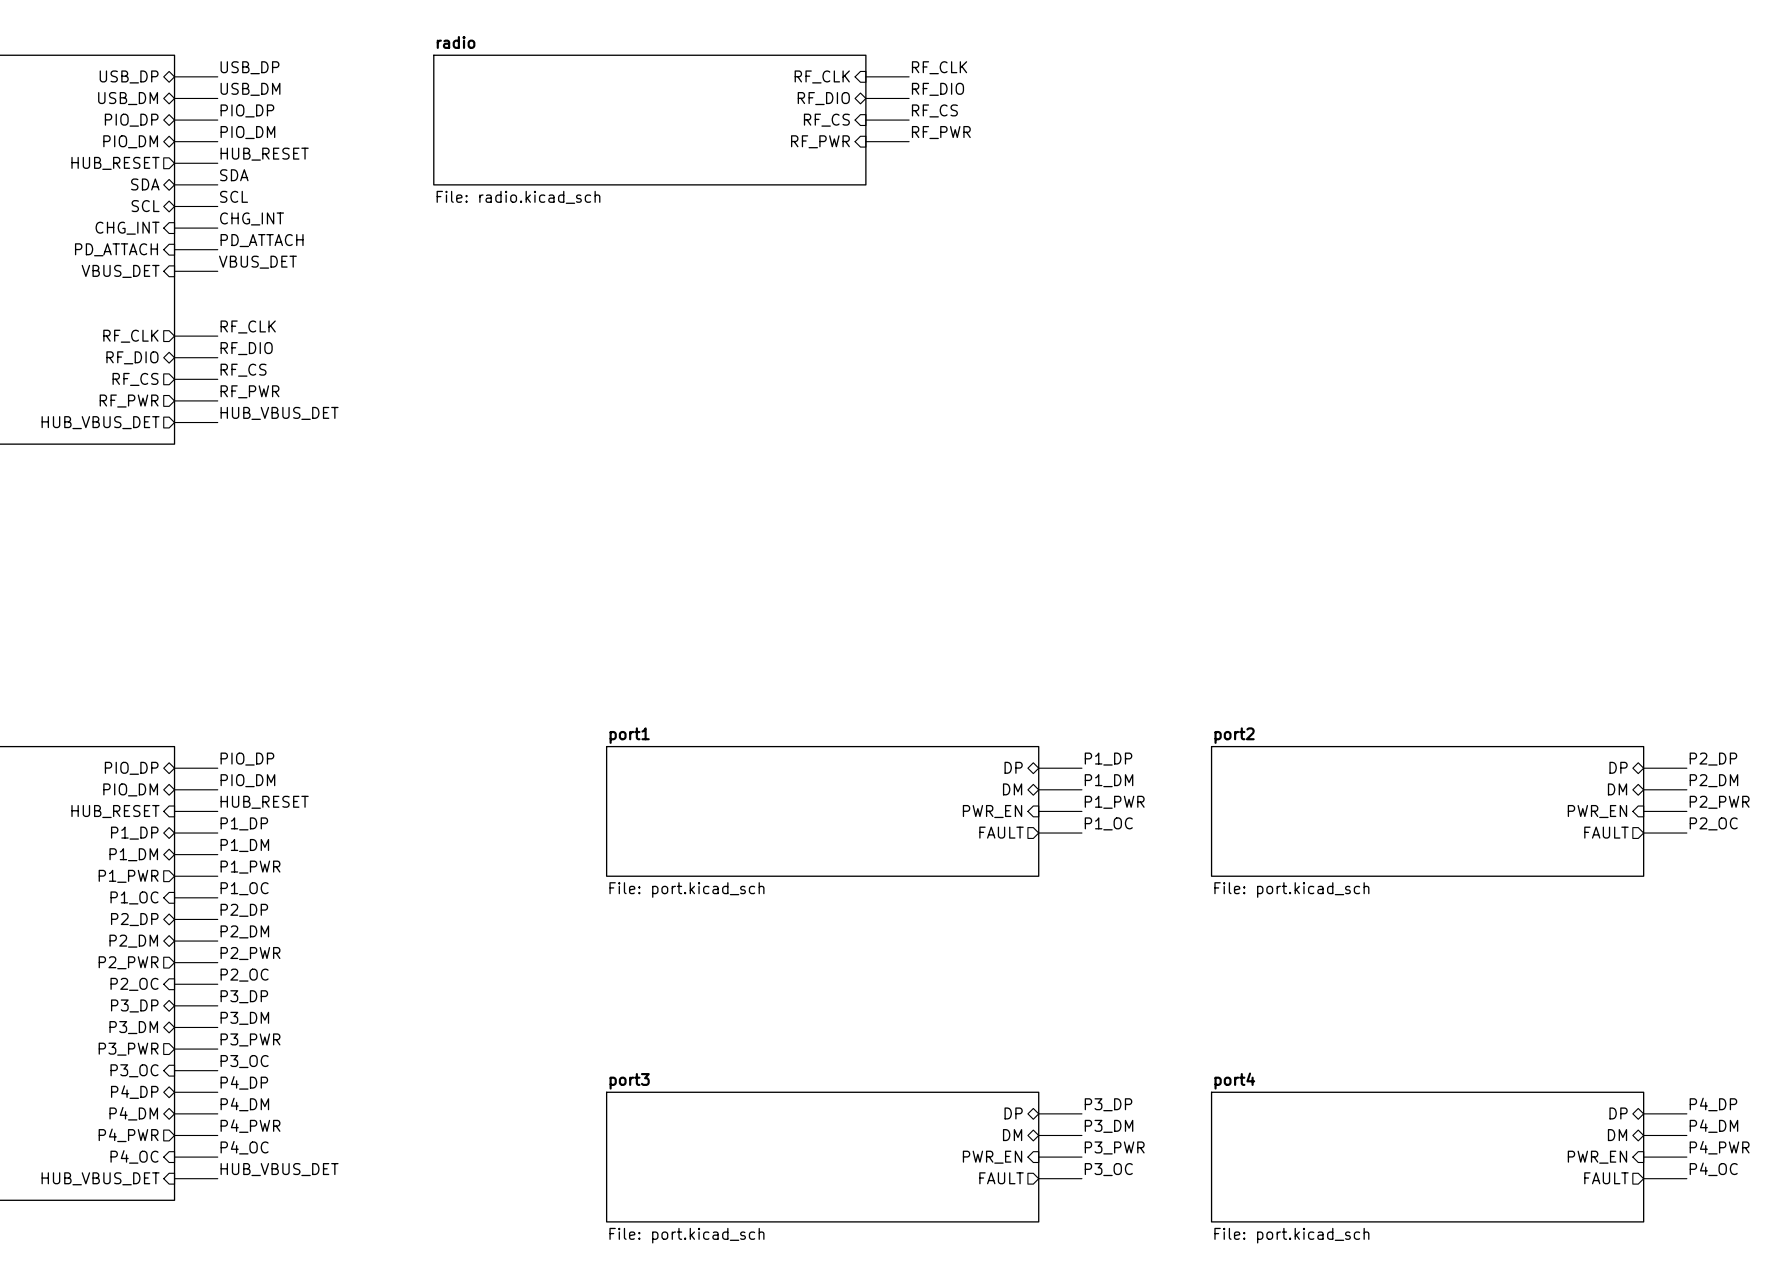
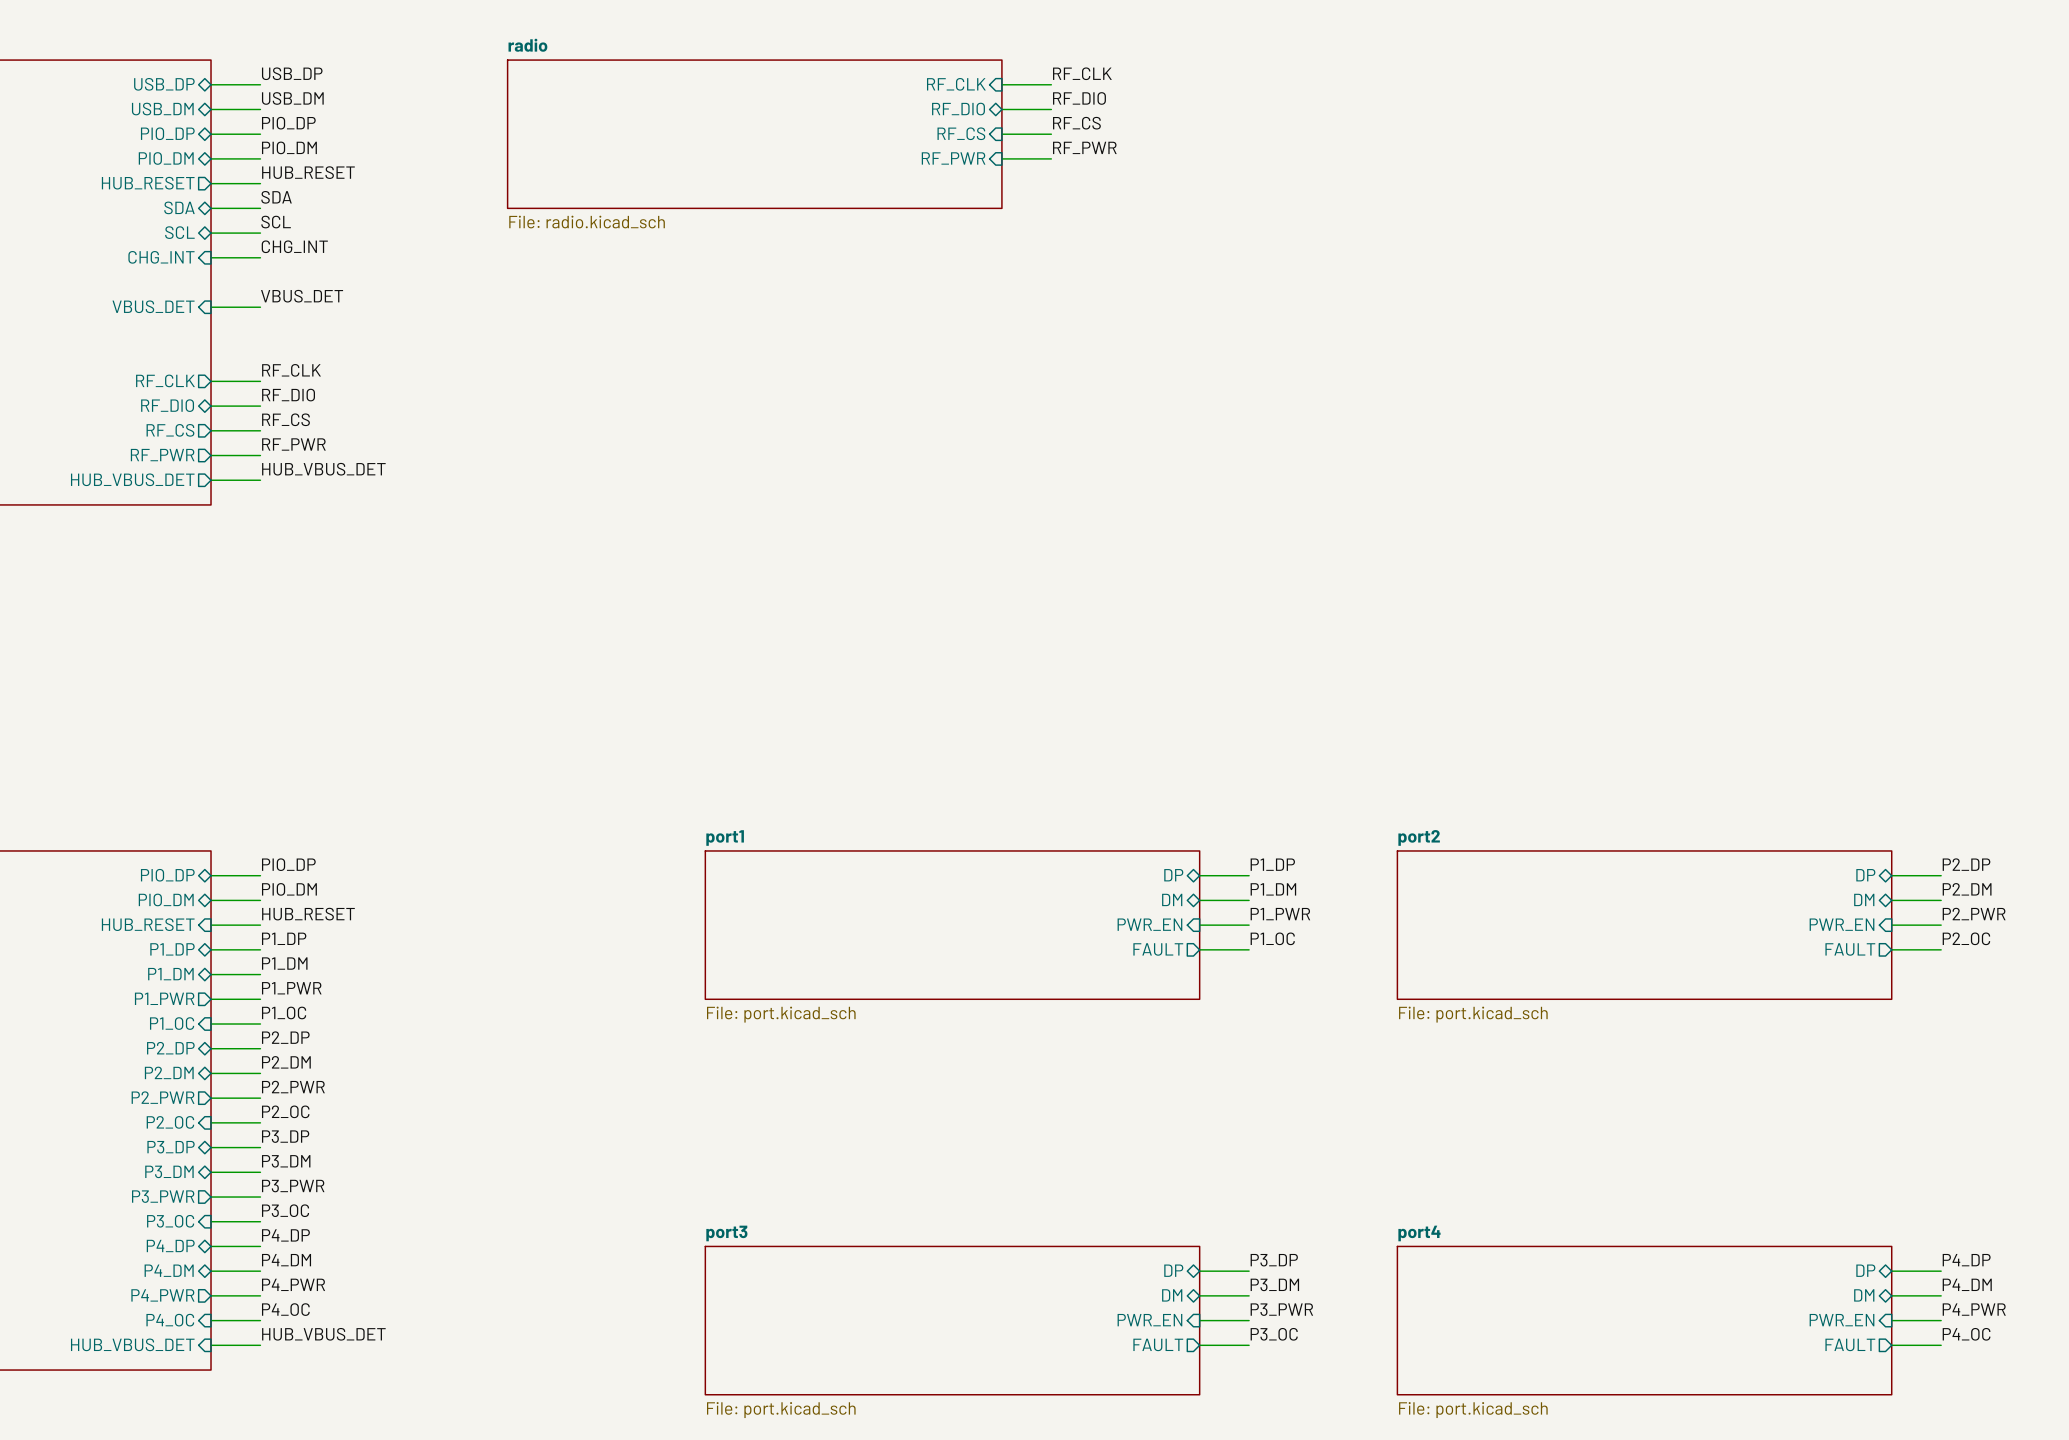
label: PD_ATTACH (262, 240) -> none
sheet pin: PD_ATTACH (116, 249) -> none
wire: (174, 249) (217, 249) -> none

